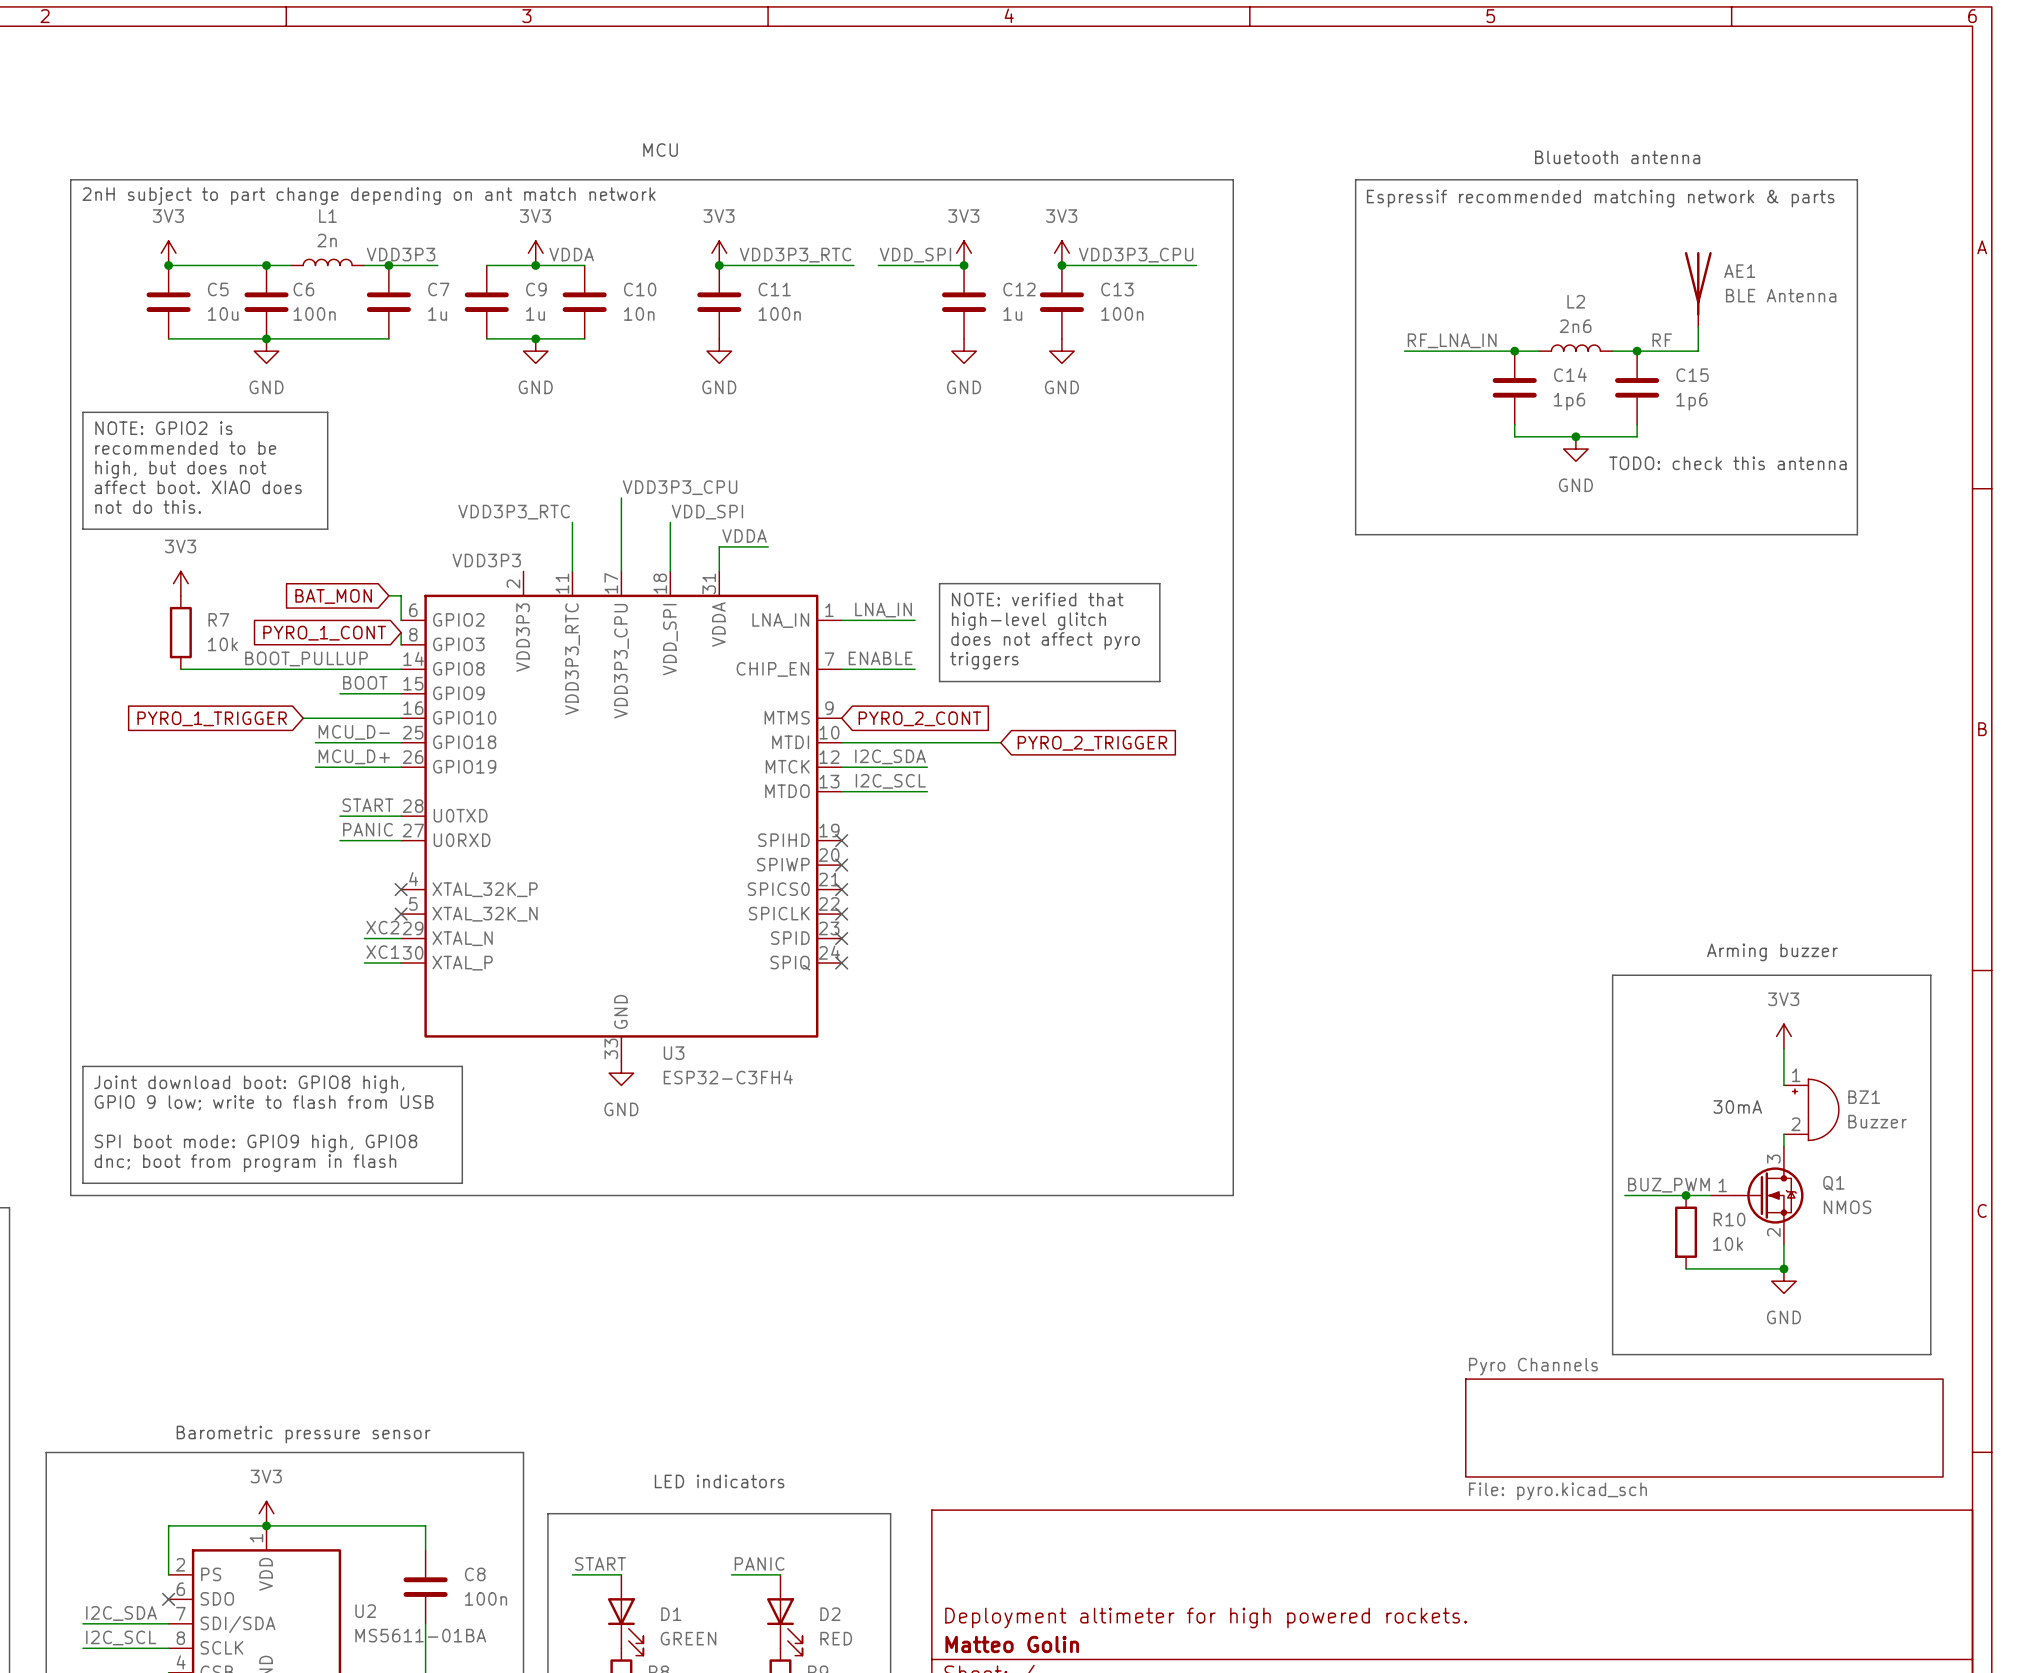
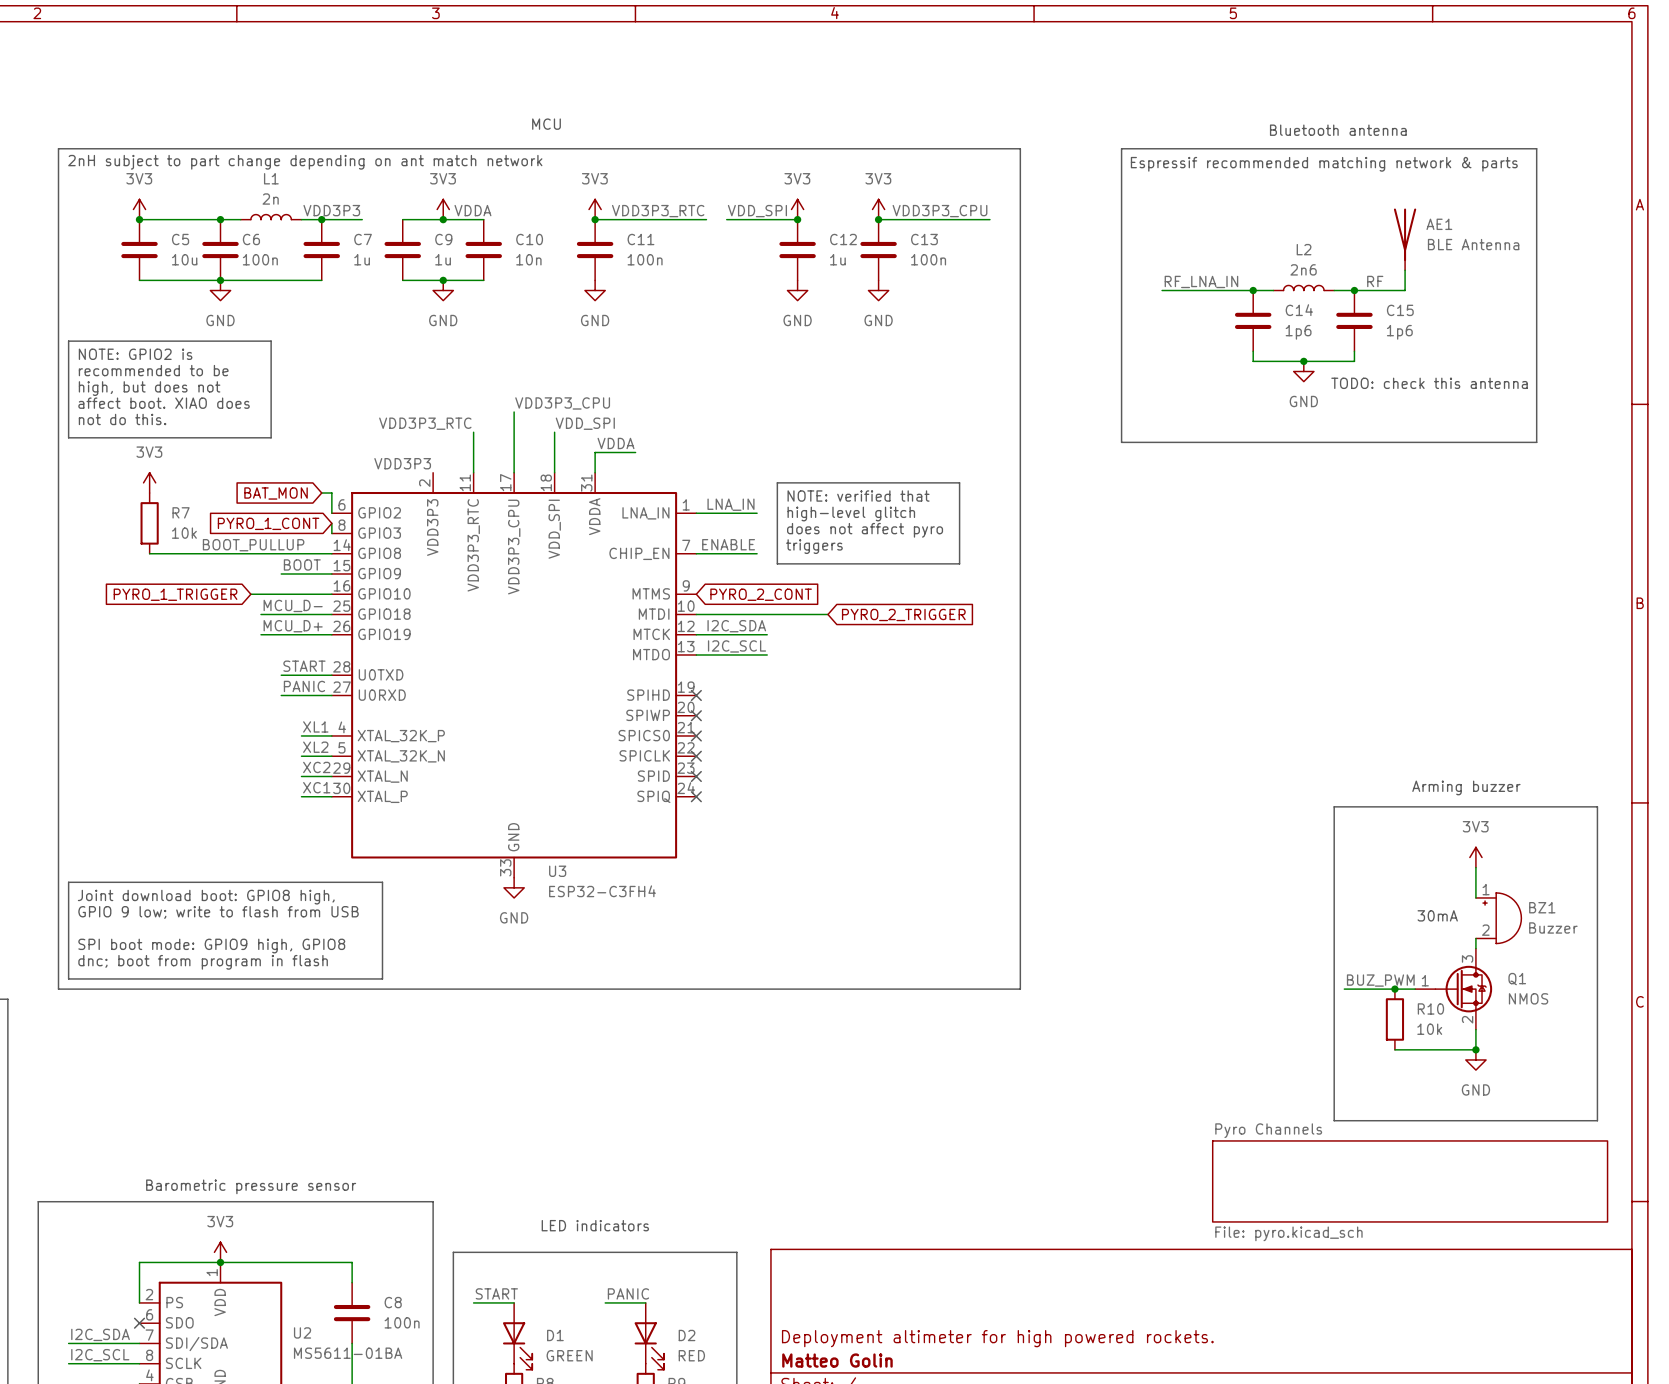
label: none -> XL1 (315, 726)
wire: none -> (301, 735) (331, 735)
no-connect mark: (401, 889) -> none
label: none -> XL2 (315, 747)
wire: none -> (301, 756) (331, 756)
no-connect mark: (401, 914) -> none

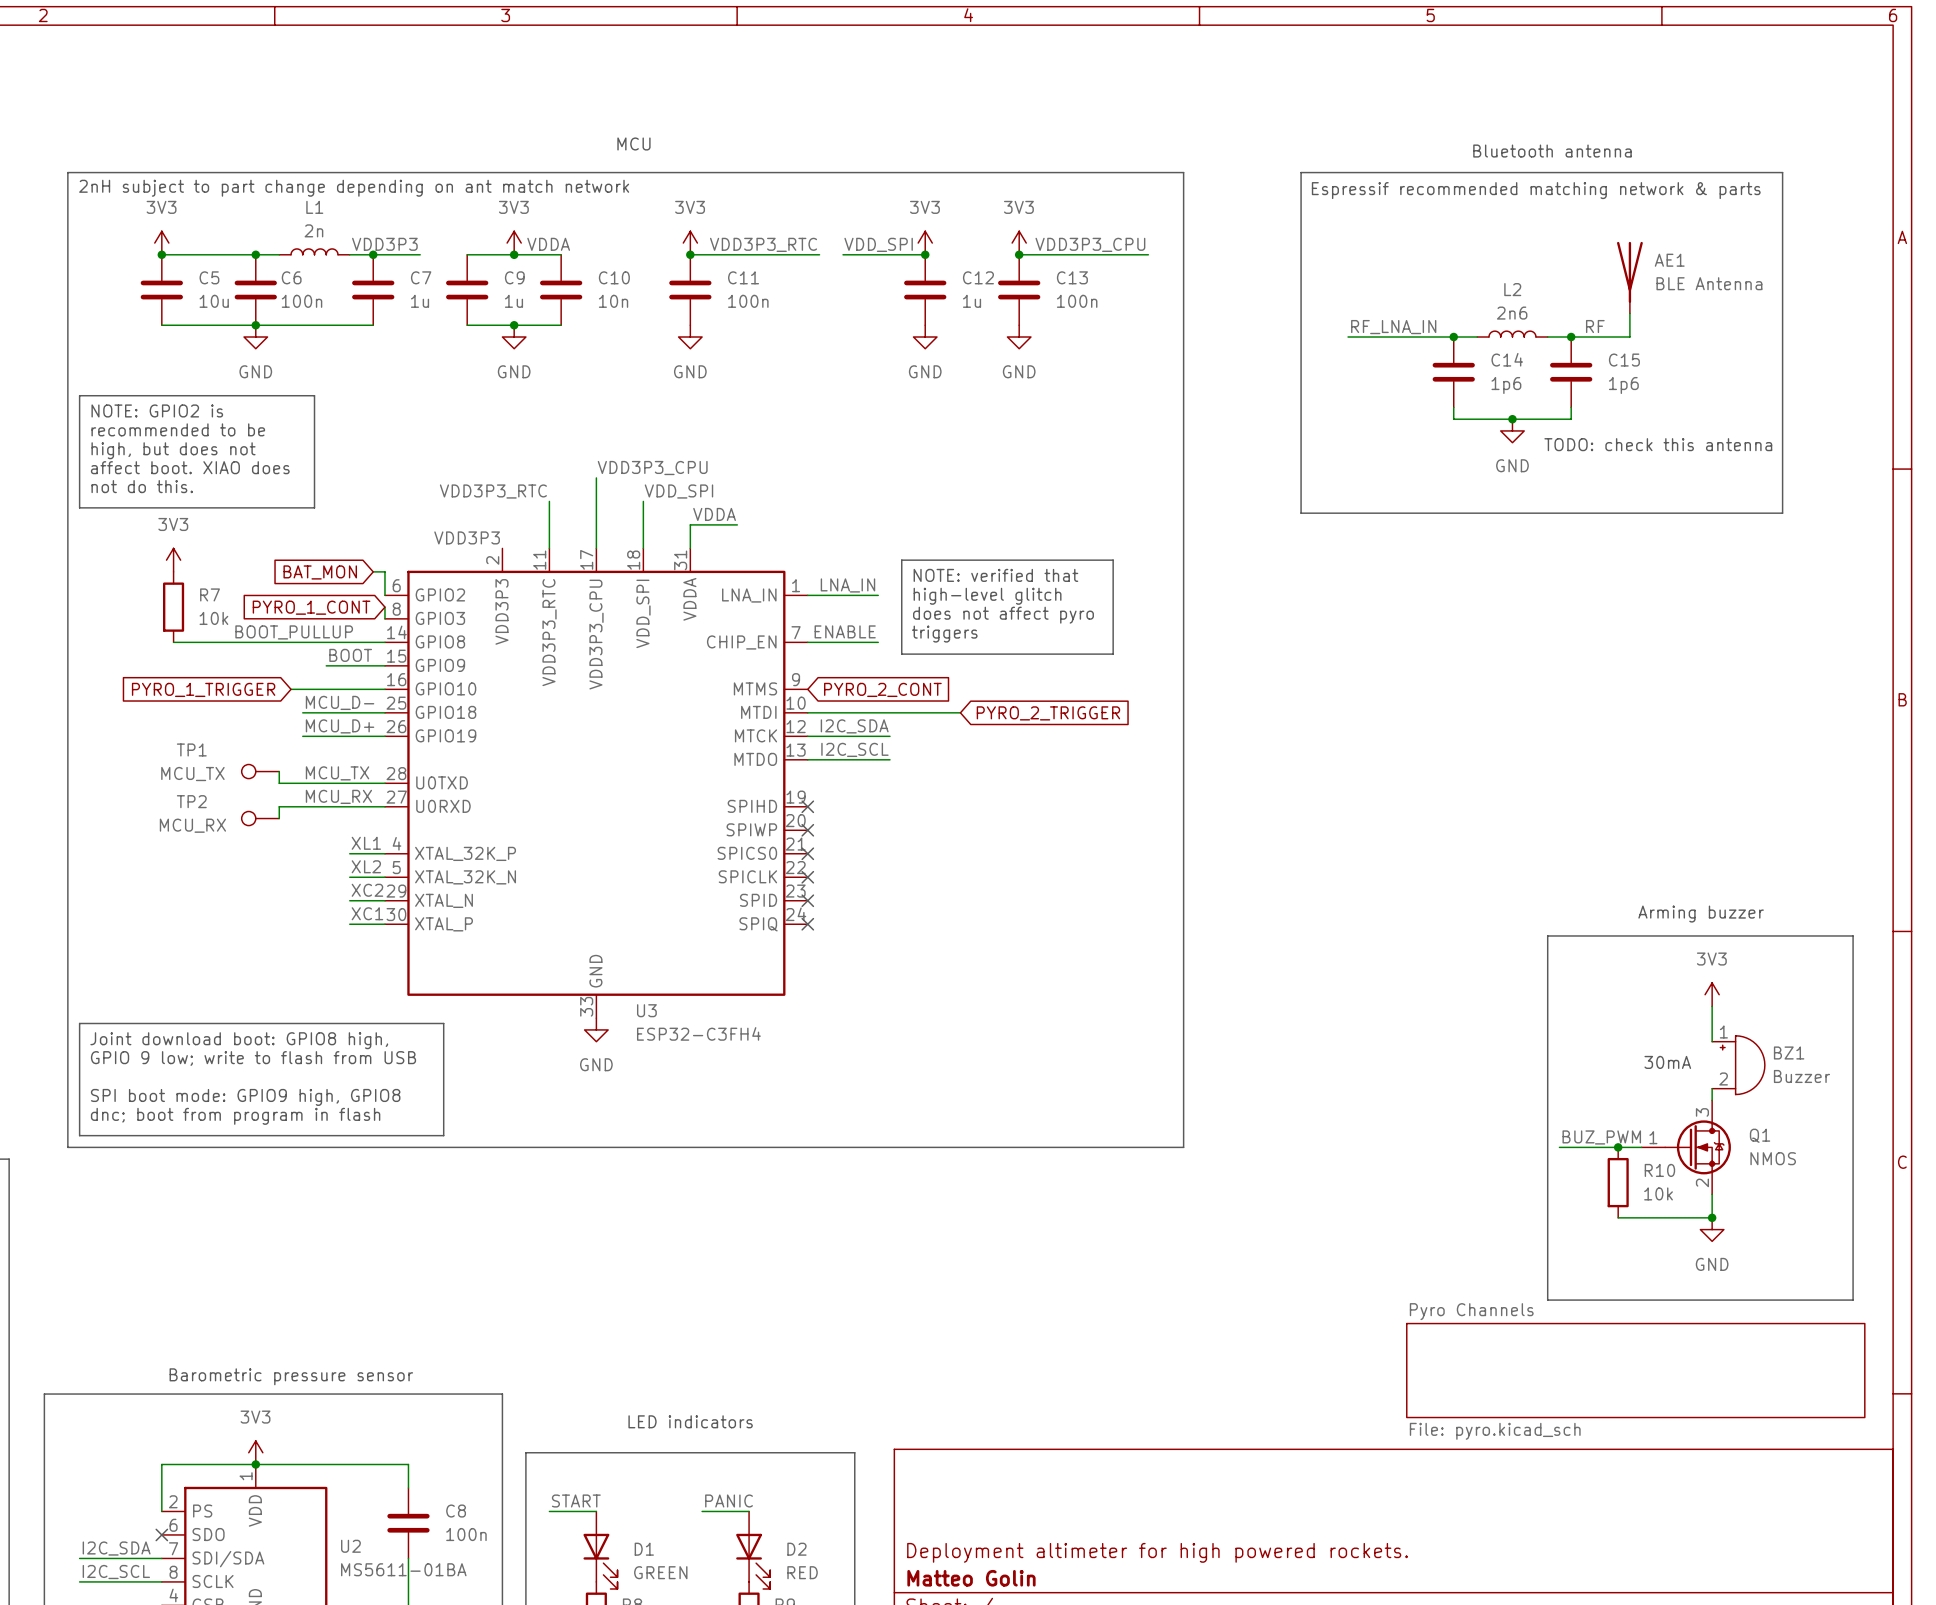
TP1: none -> MCU_TX (260, 771)
wire: none -> (279, 771) (279, 783) (326, 783)
label: none -> MCU_TX (337, 773)
label: START (304, 666) -> none
label: none -> MCU_RX (338, 796)
label: PANIC (304, 686) -> none
wire: none -> (326, 806) (279, 806) (279, 818)
TP2: none -> MCU_RX (260, 818)

